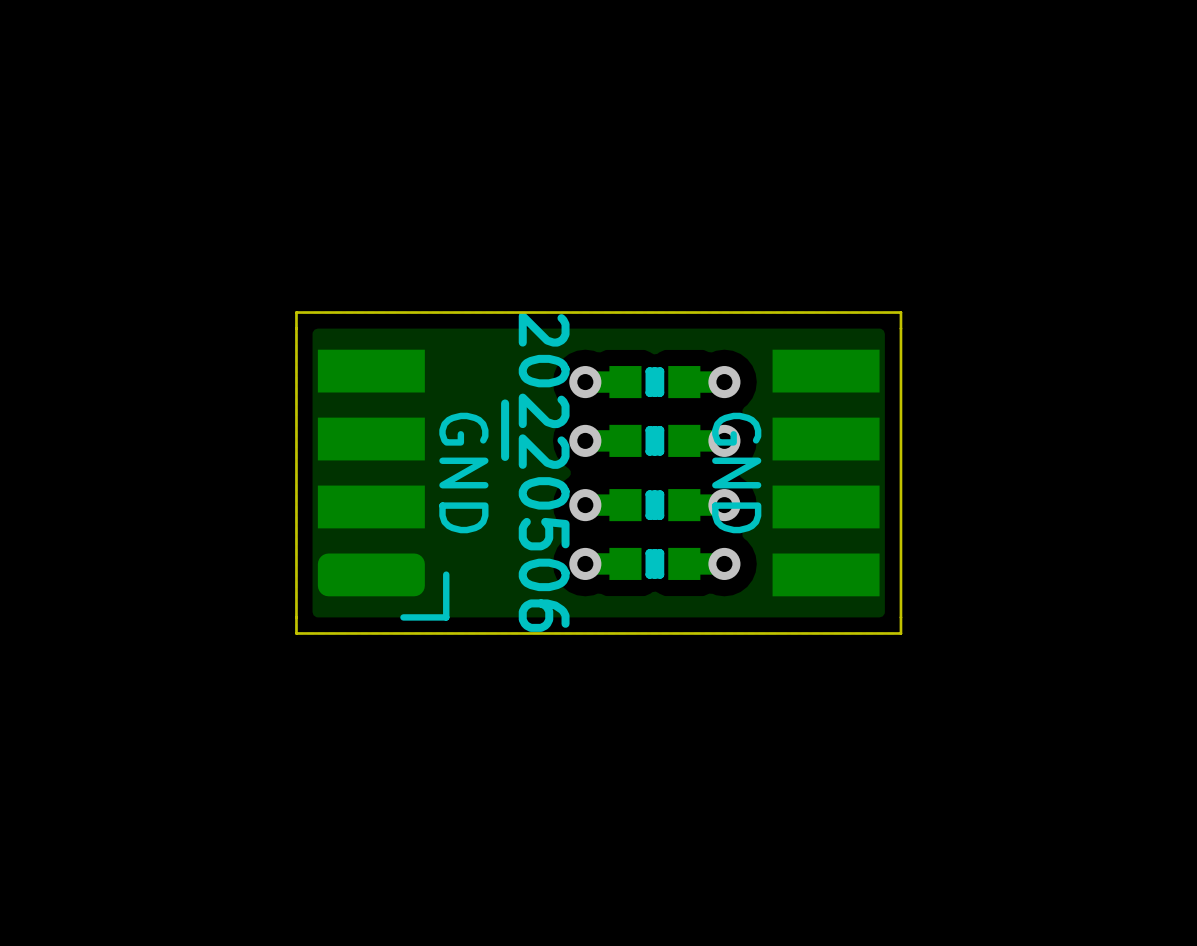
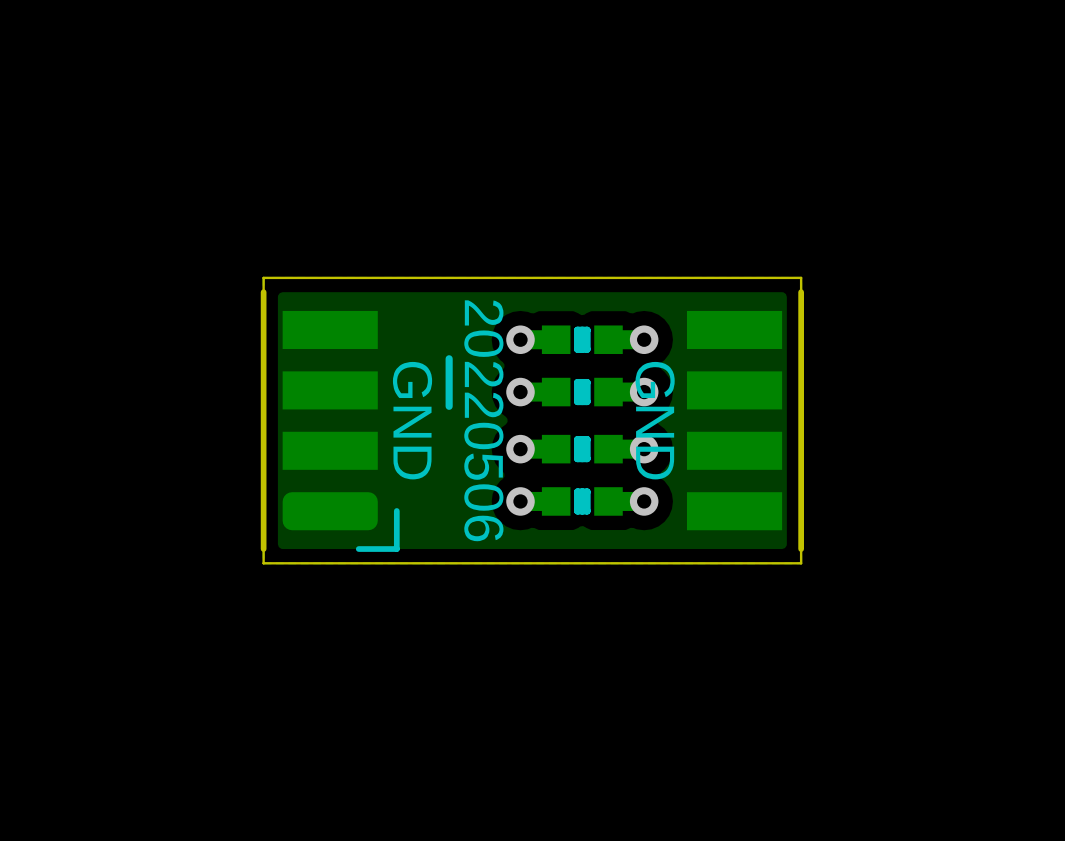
board edge: (296, 328) (296, 617) -> none
board edge: (900, 328) (900, 617) -> none
part footprint: [317, 349, 450, 621] -> [260, 289, 400, 552]
part footprint: [772, 349, 880, 597] -> [686, 289, 804, 552]

